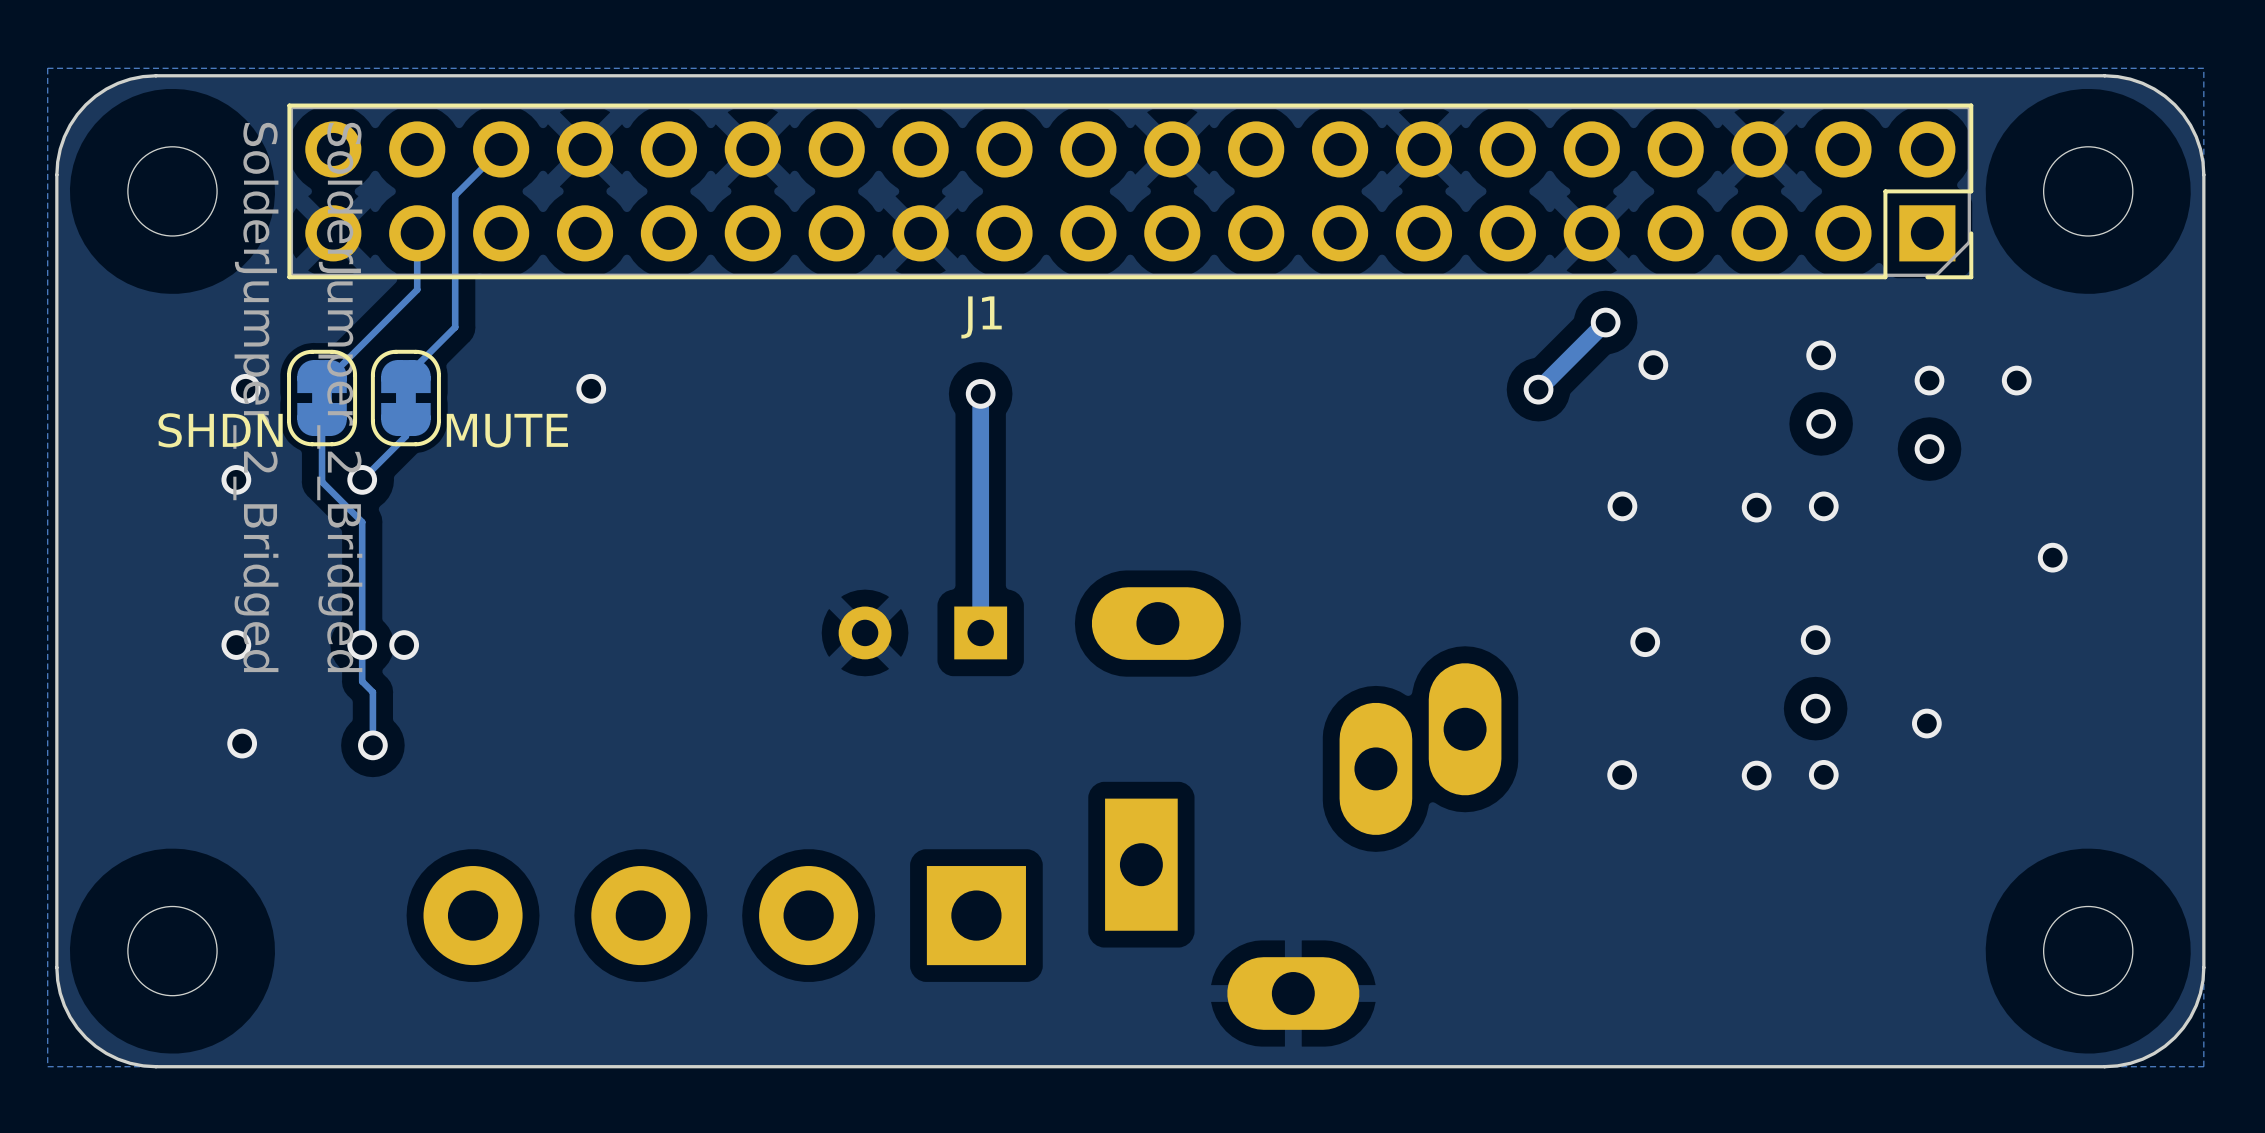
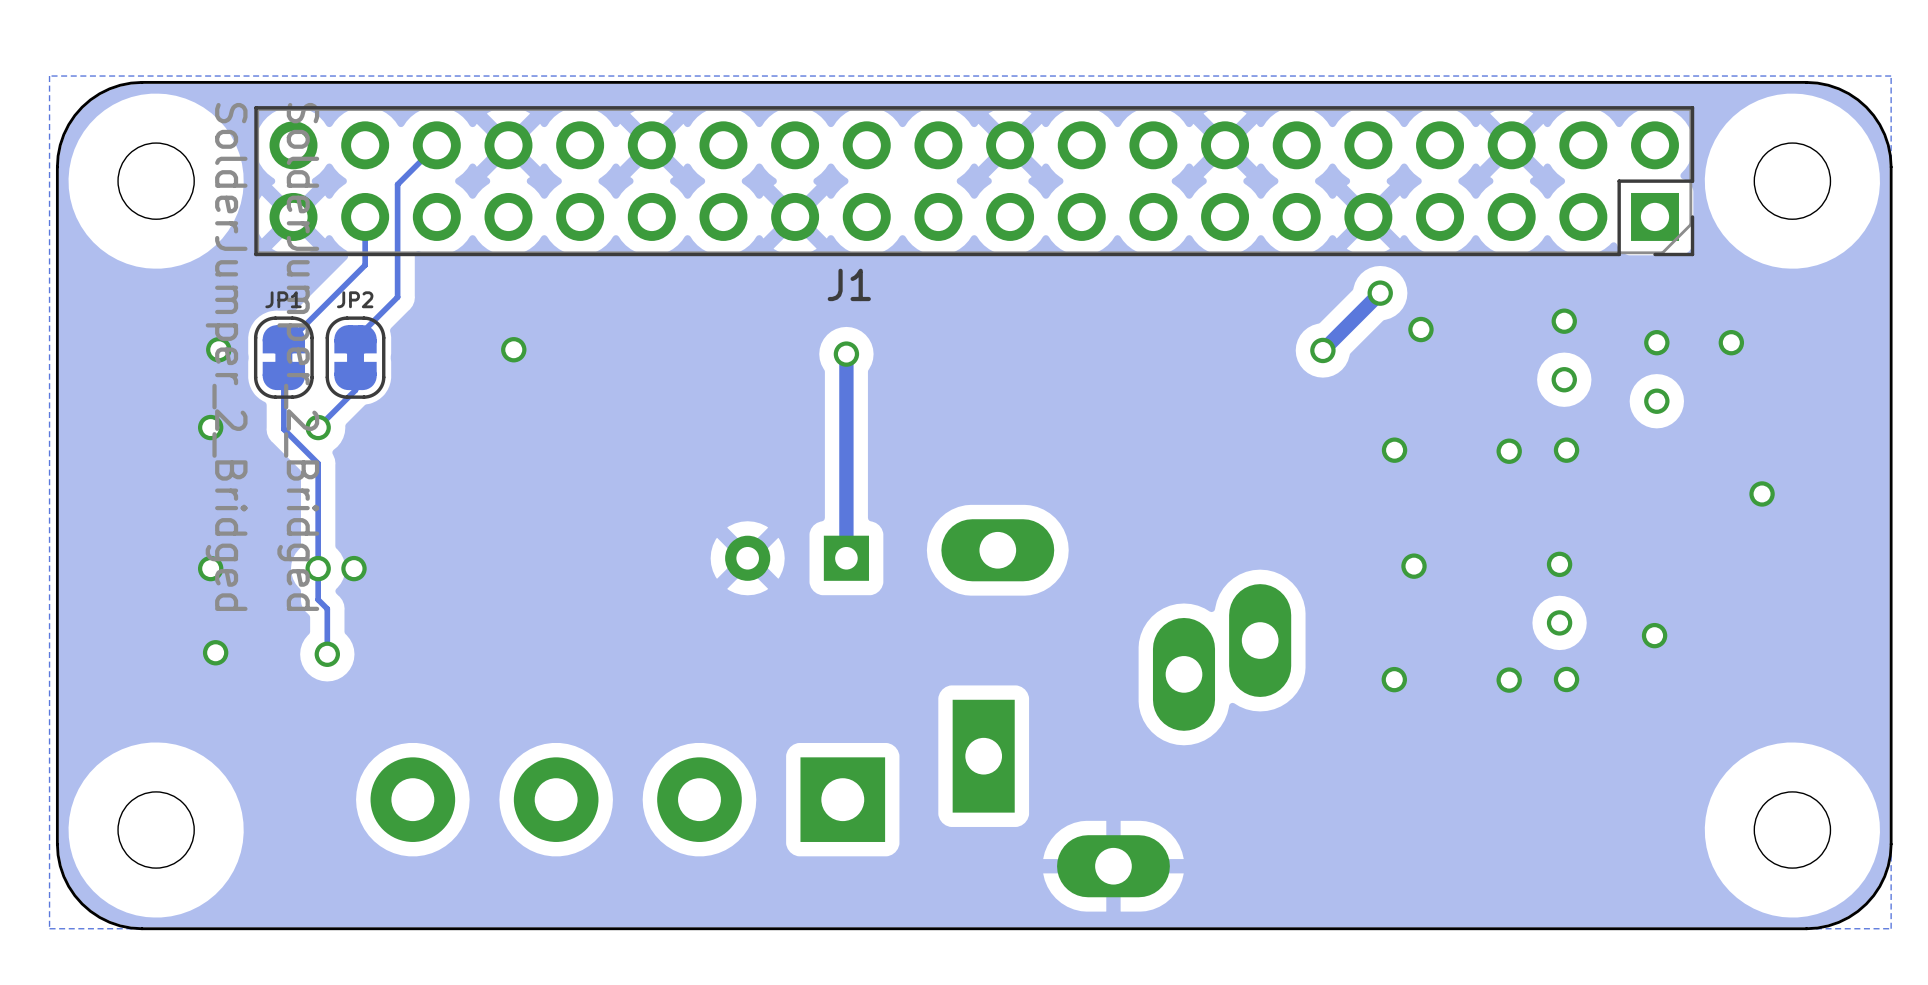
SHDN name: SHDN (220, 430) -> JP1 (283, 299)
MUTE name: MUTE (507, 430) -> JP2 (355, 299)

